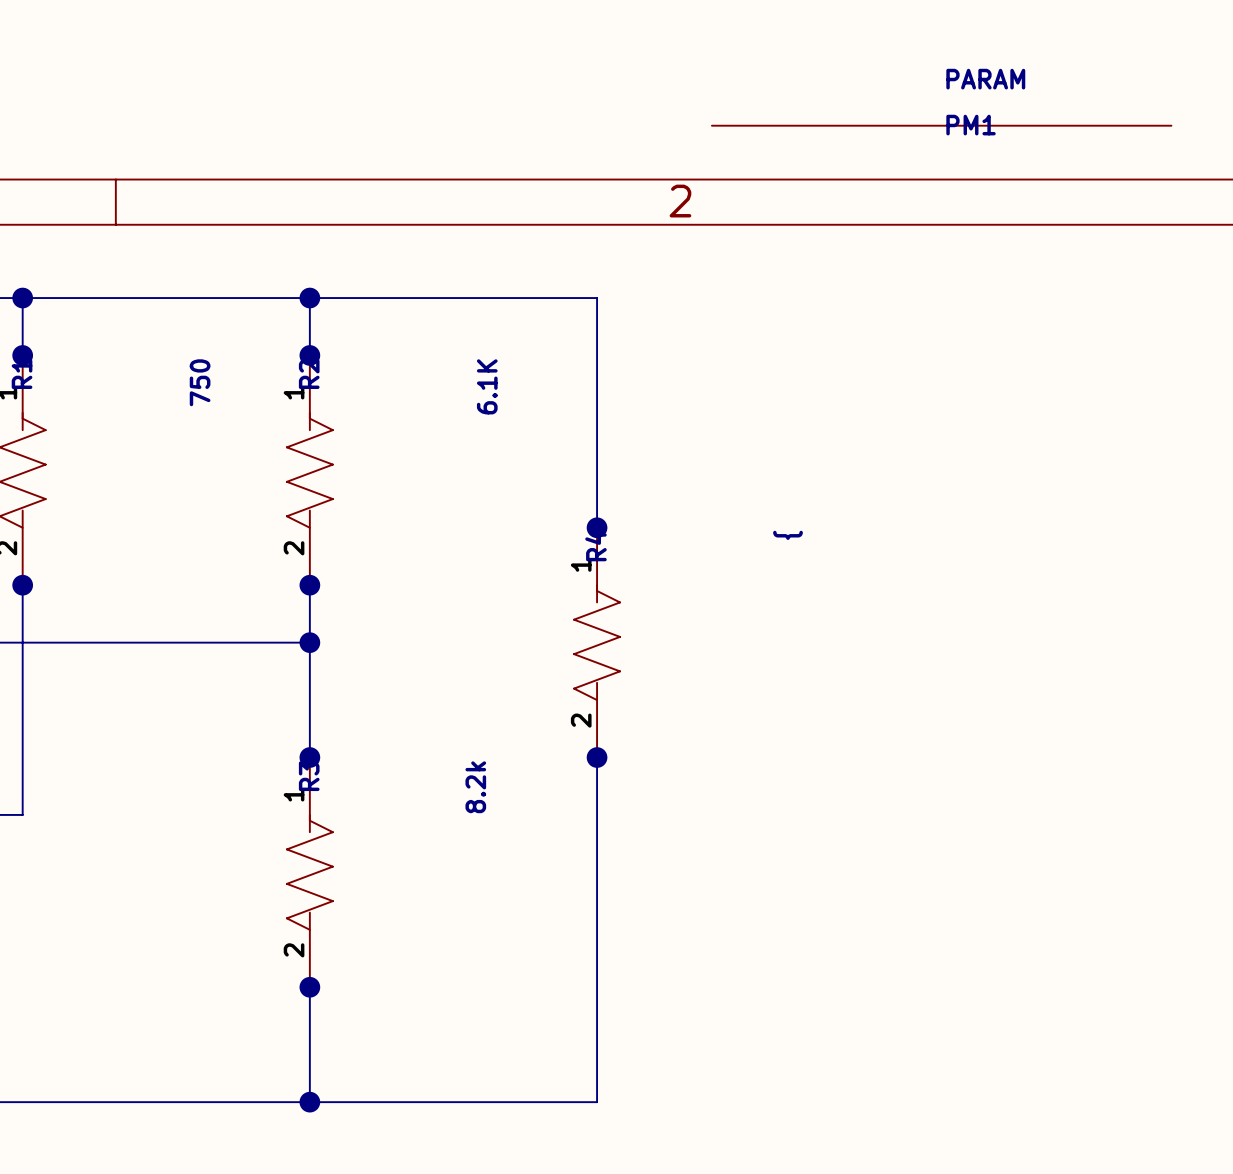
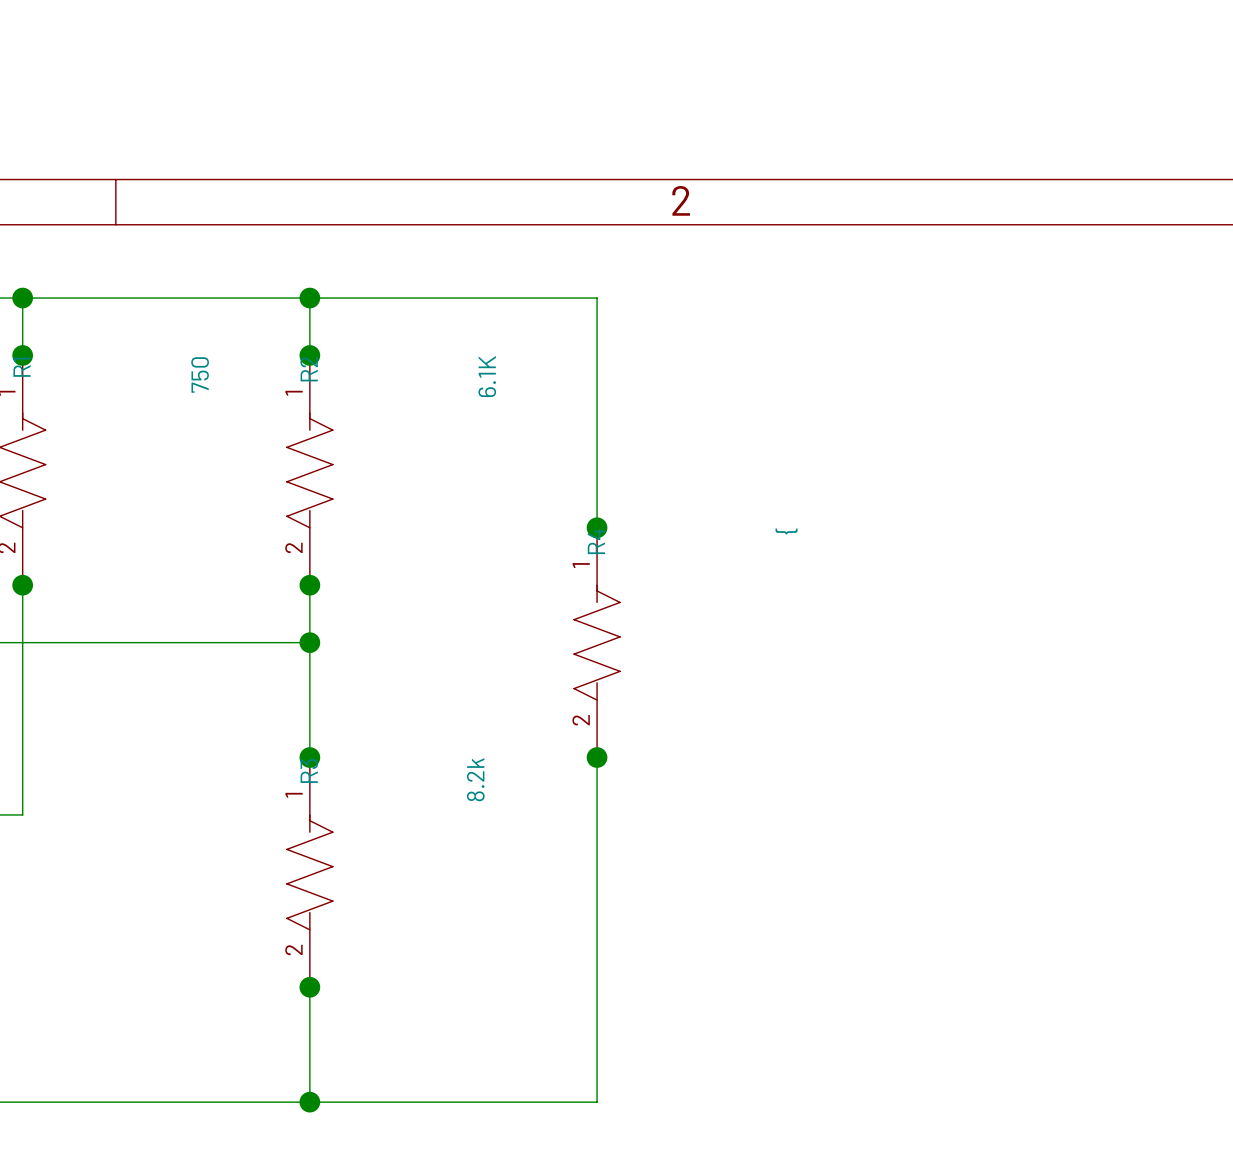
PM1: PARAM (941, 125) -> none

